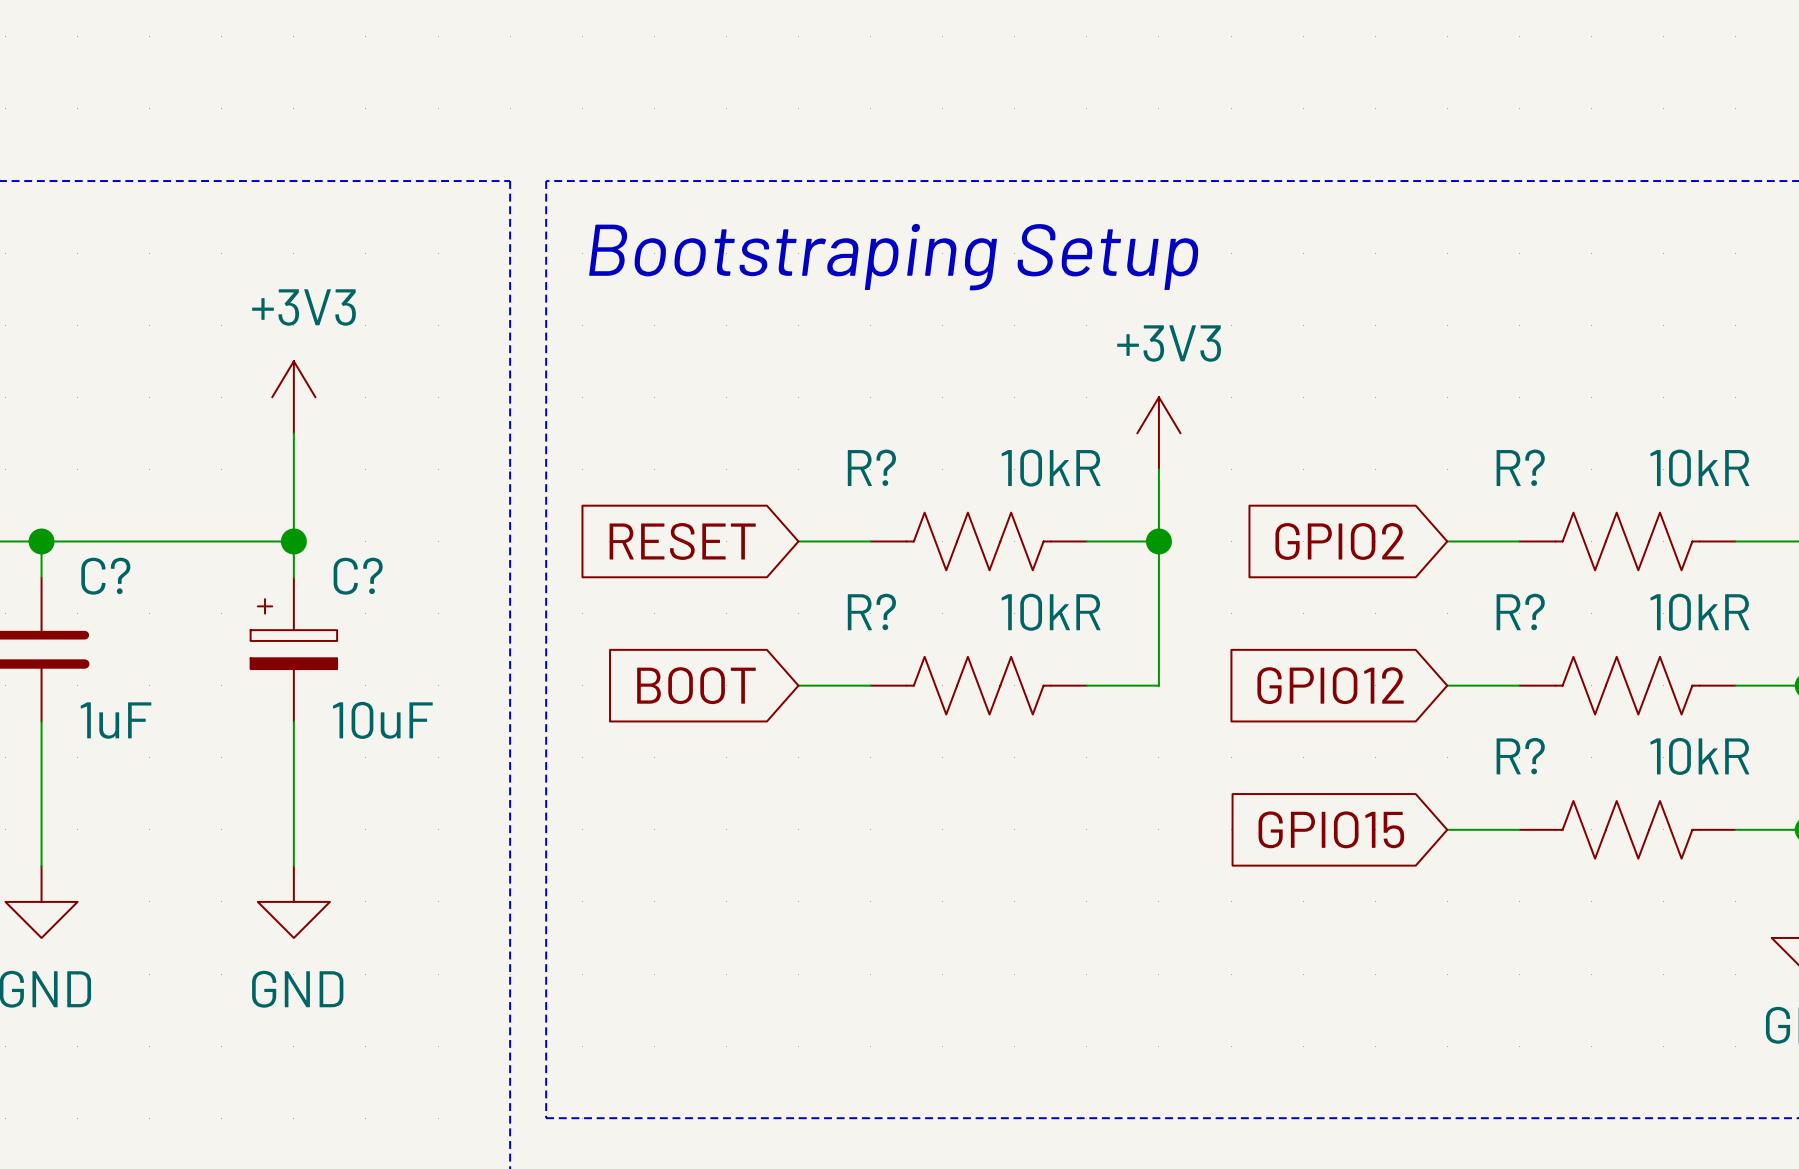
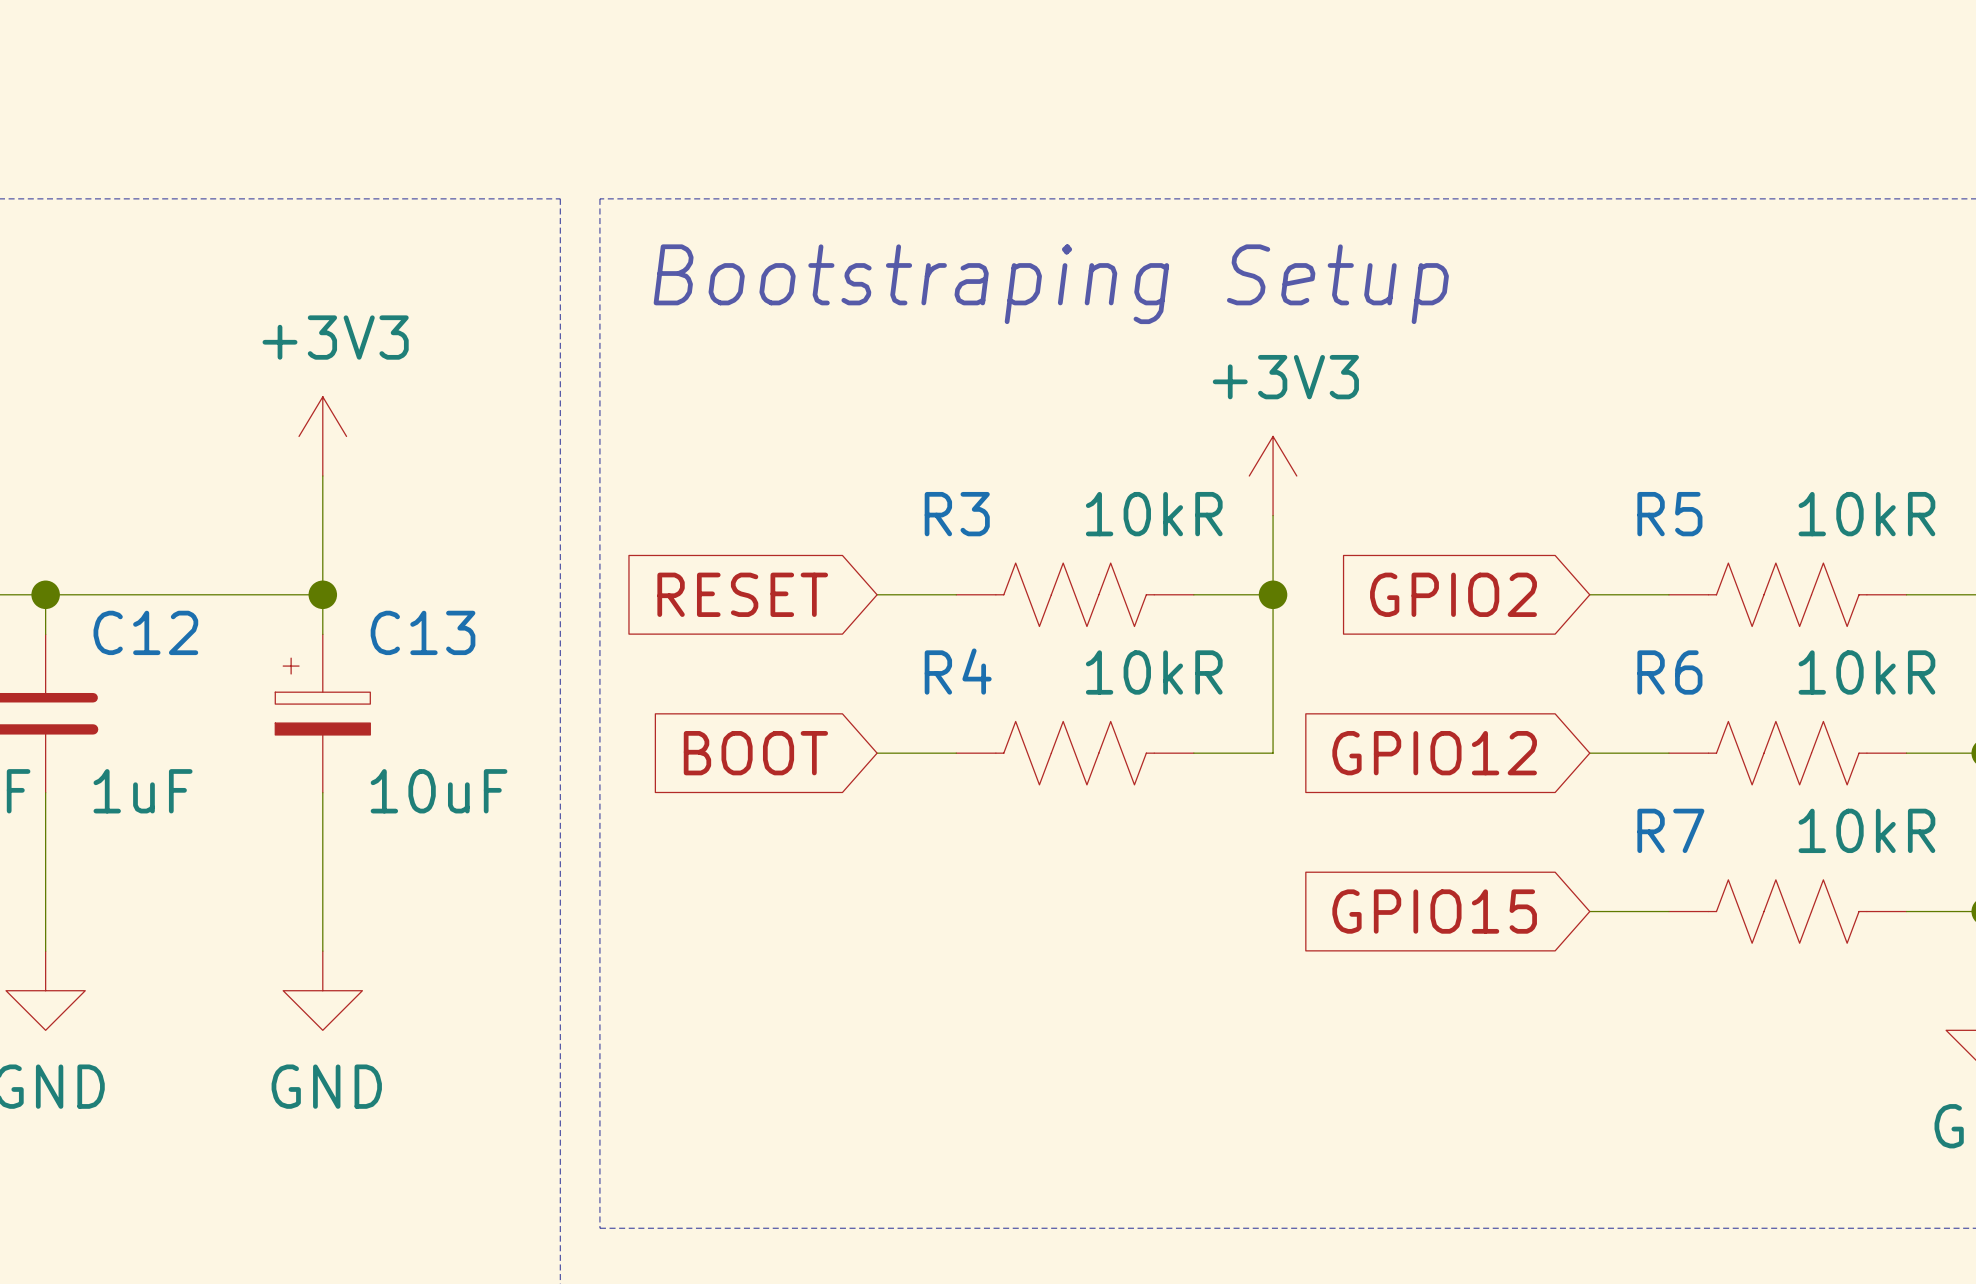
R? name: R? (871, 467) -> R3 (957, 514)
R? name: R? (1520, 467) -> R5 (1669, 514)
C? name: C? (105, 576) -> C12 (145, 632)
C? name: C? (358, 576) -> C13 (423, 632)
R? name: R? (871, 611) -> R4 (958, 671)
R? name: R? (1520, 611) -> R6 (1669, 672)
R? name: R? (1520, 756) -> R7 (1670, 830)

